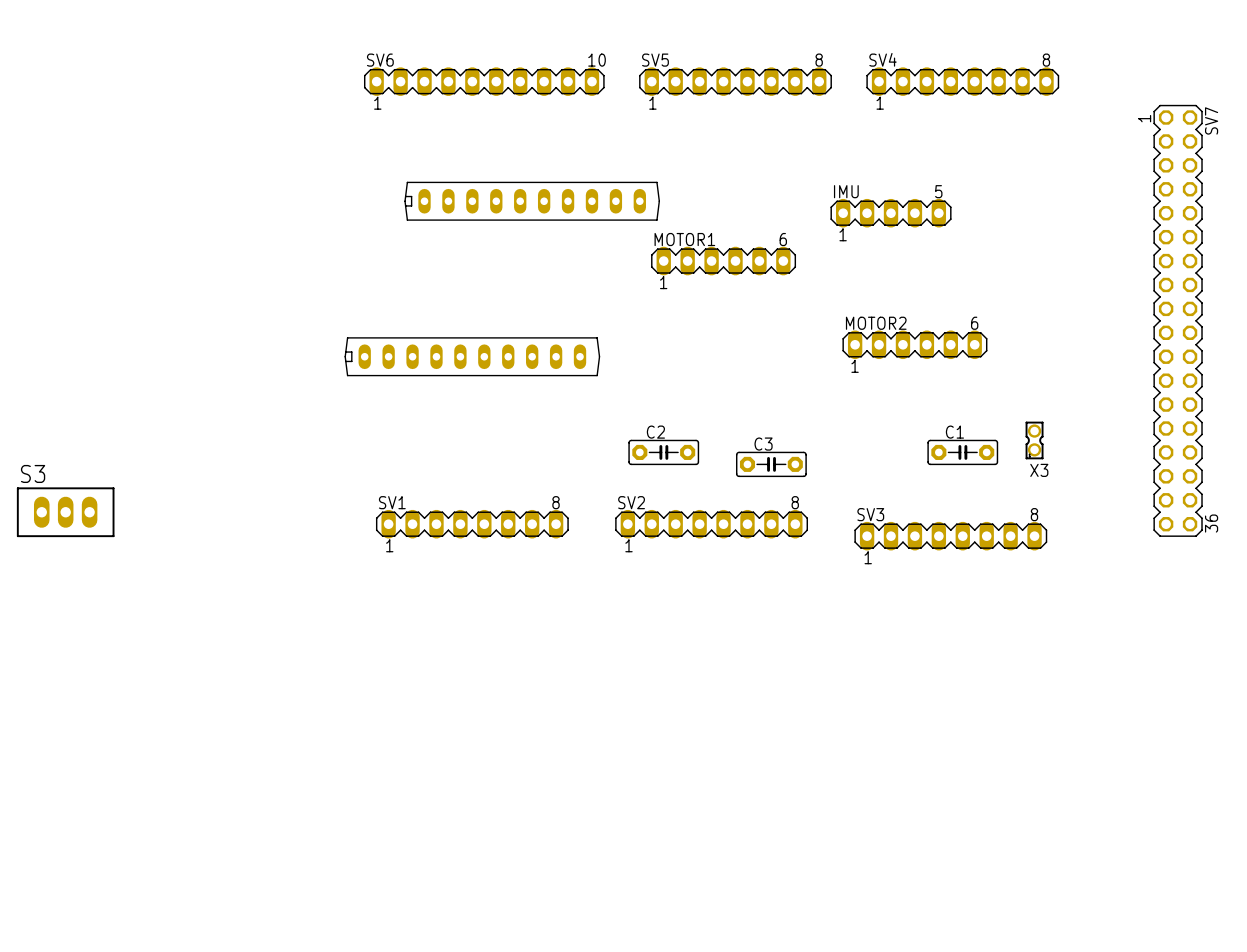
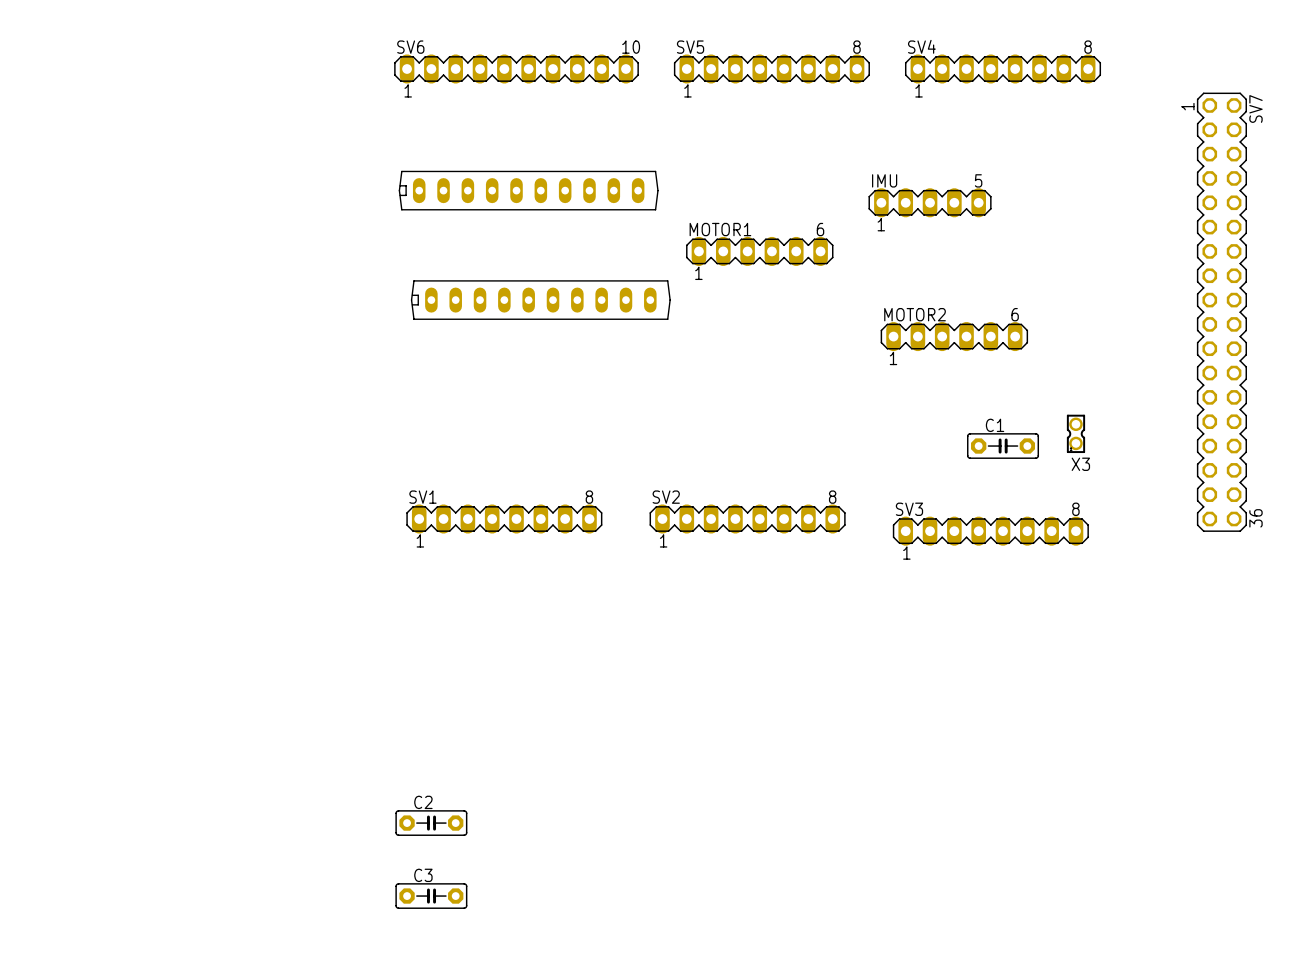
part position: (532, 201) -> (528, 190)
part: none -> (540, 300)
part: (472, 356) -> none
C2 position: (663, 452) -> (431, 823)
C3 position: (771, 464) -> (431, 896)
S3: (65, 512) -> none

